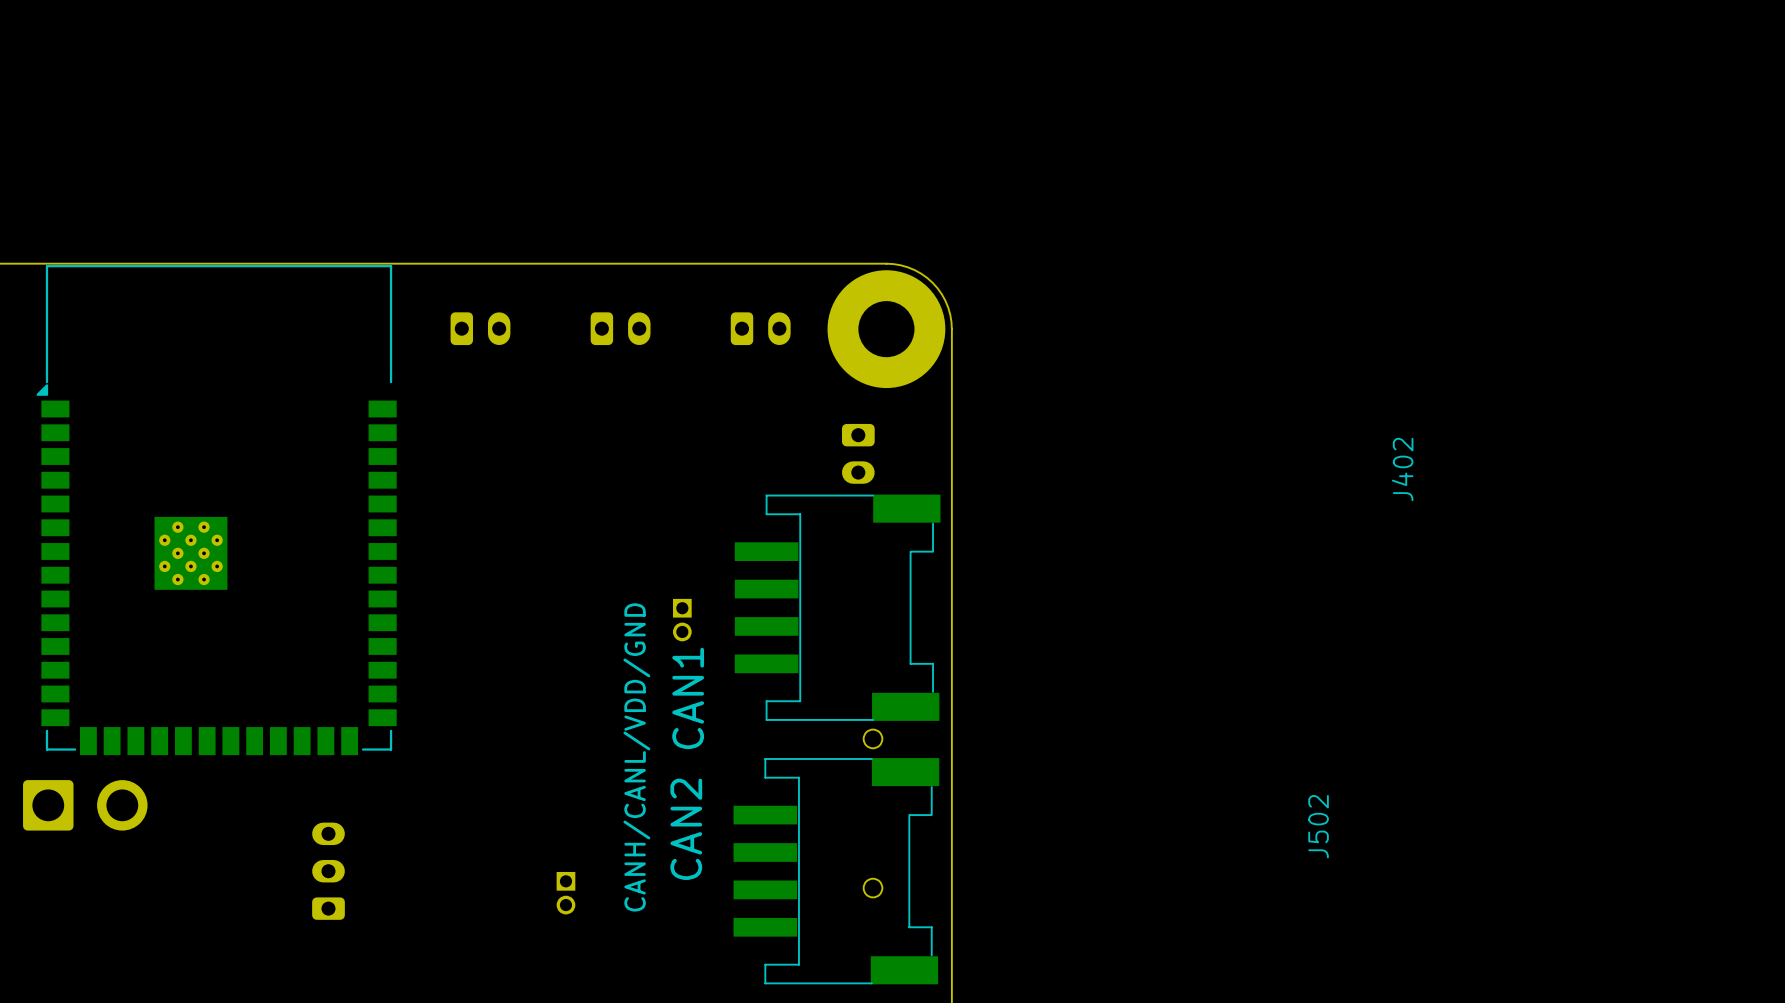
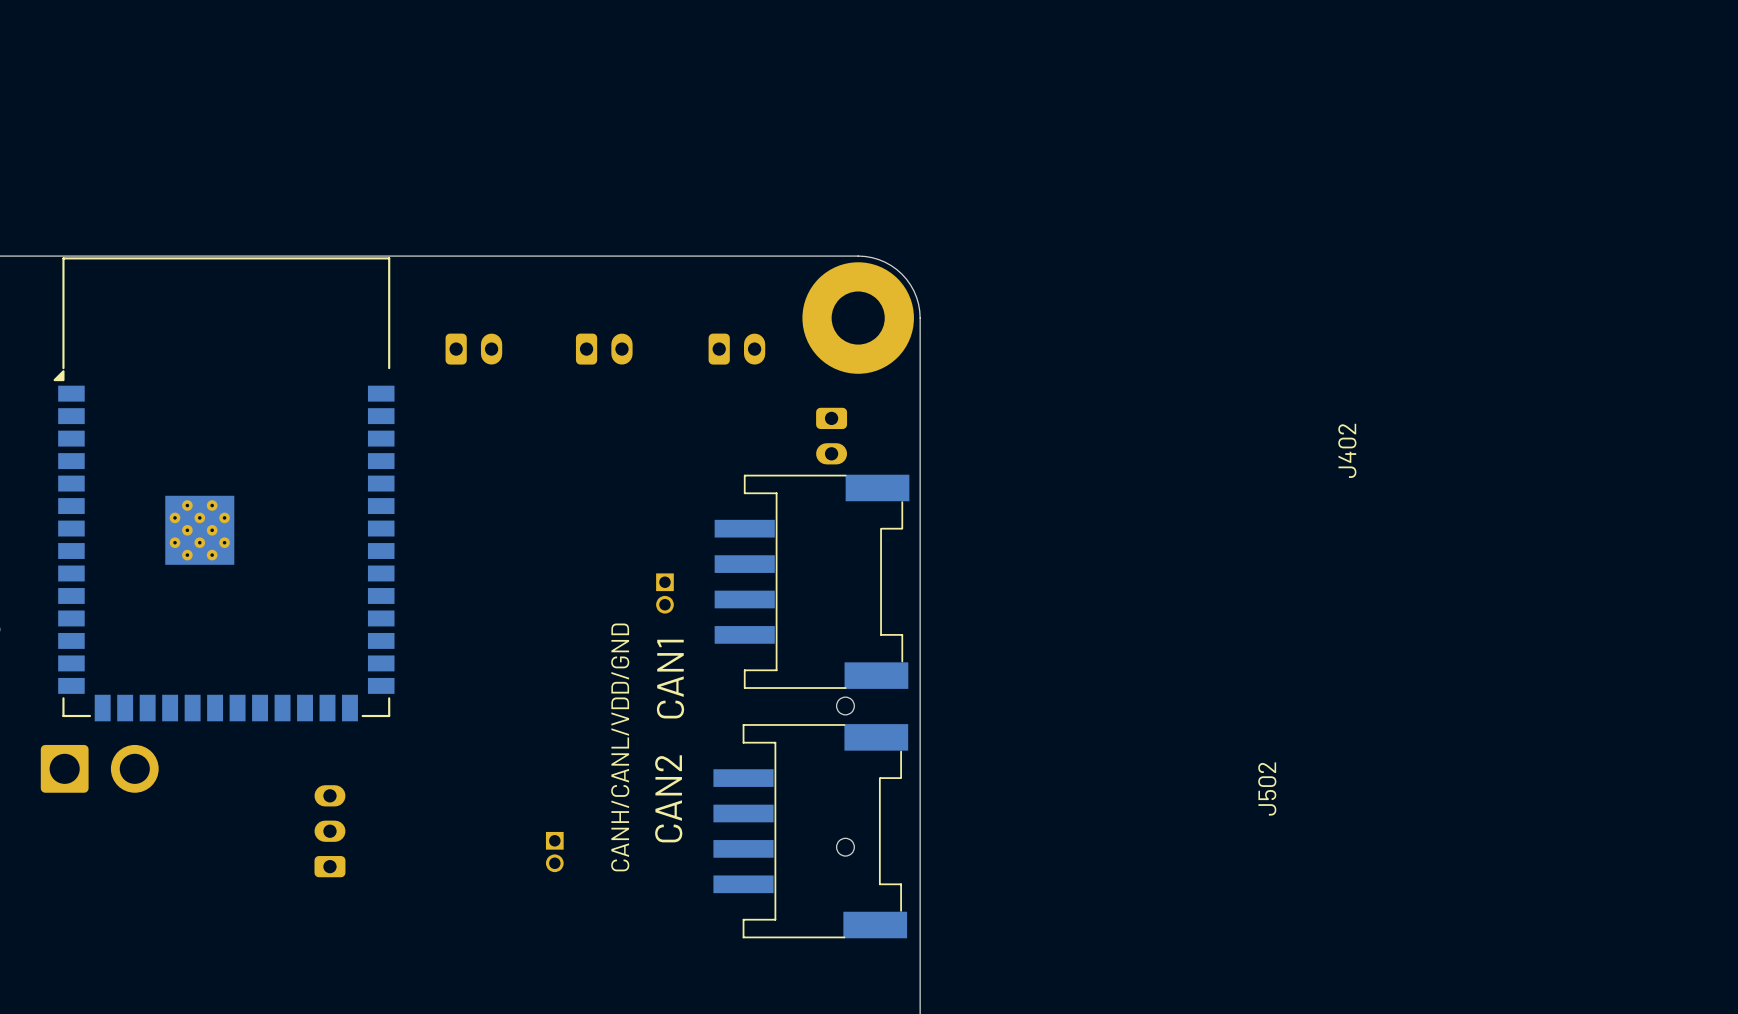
part position: (480, 328) -> (473, 349)
part position: (620, 328) -> (604, 349)
part position: (760, 328) -> (736, 349)

